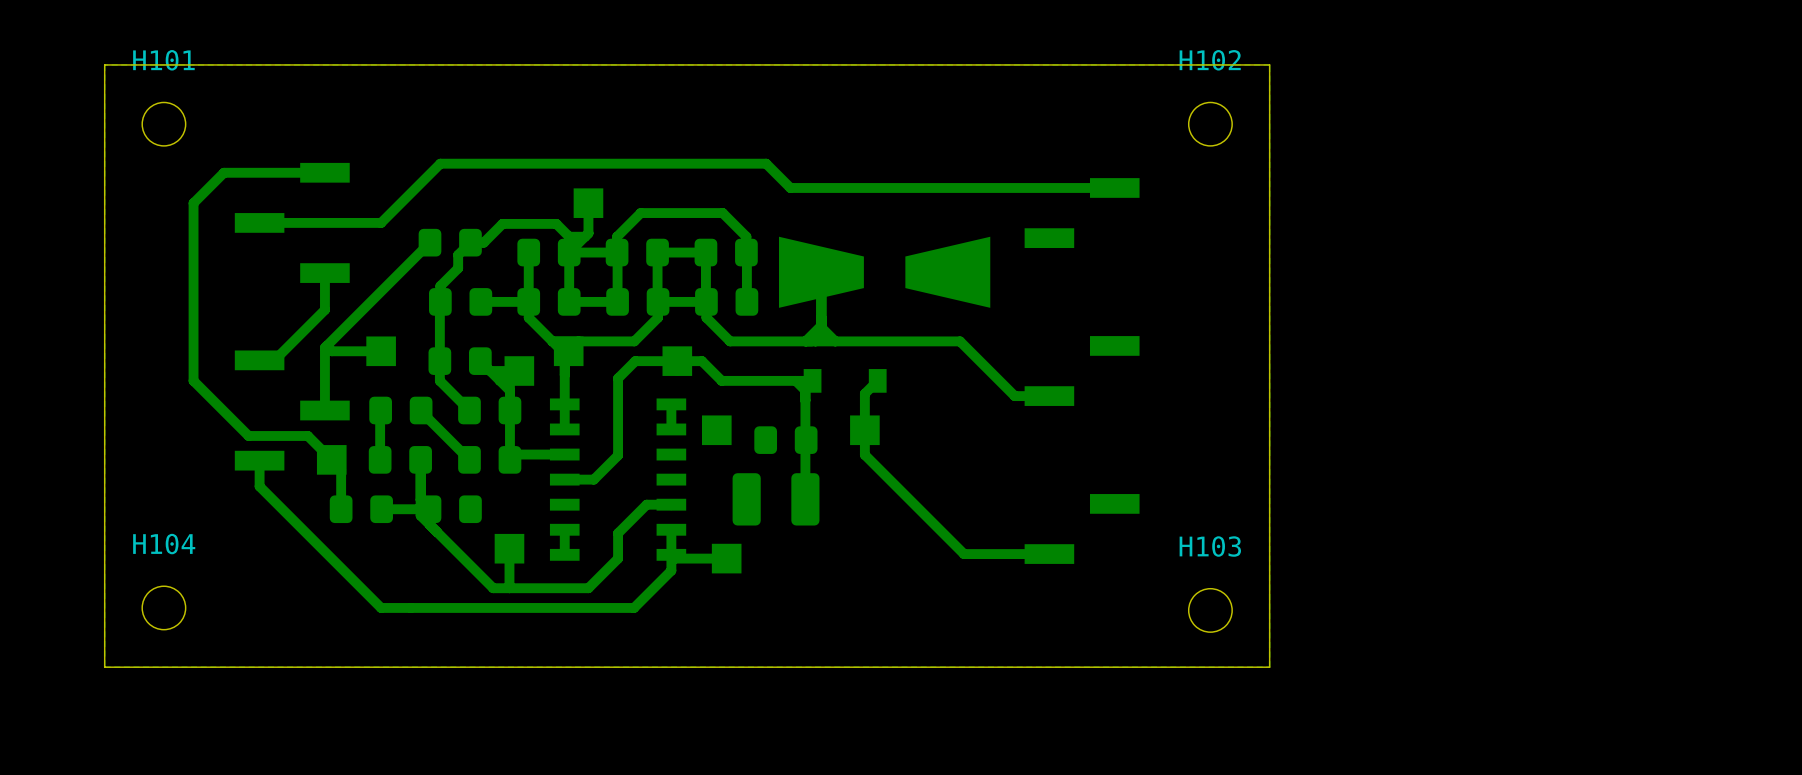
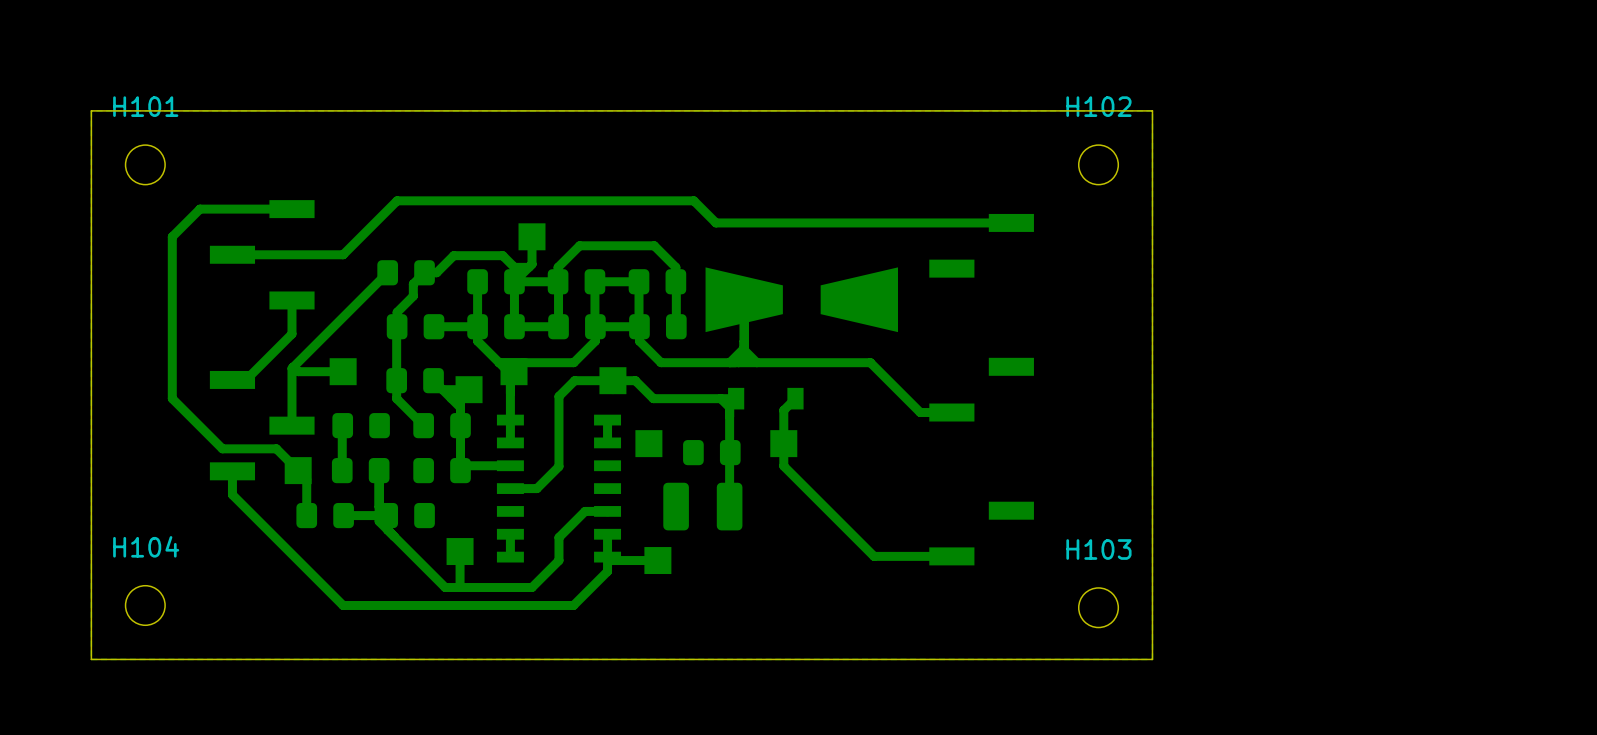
bottom track: (421, 410) (469, 459) -> none

